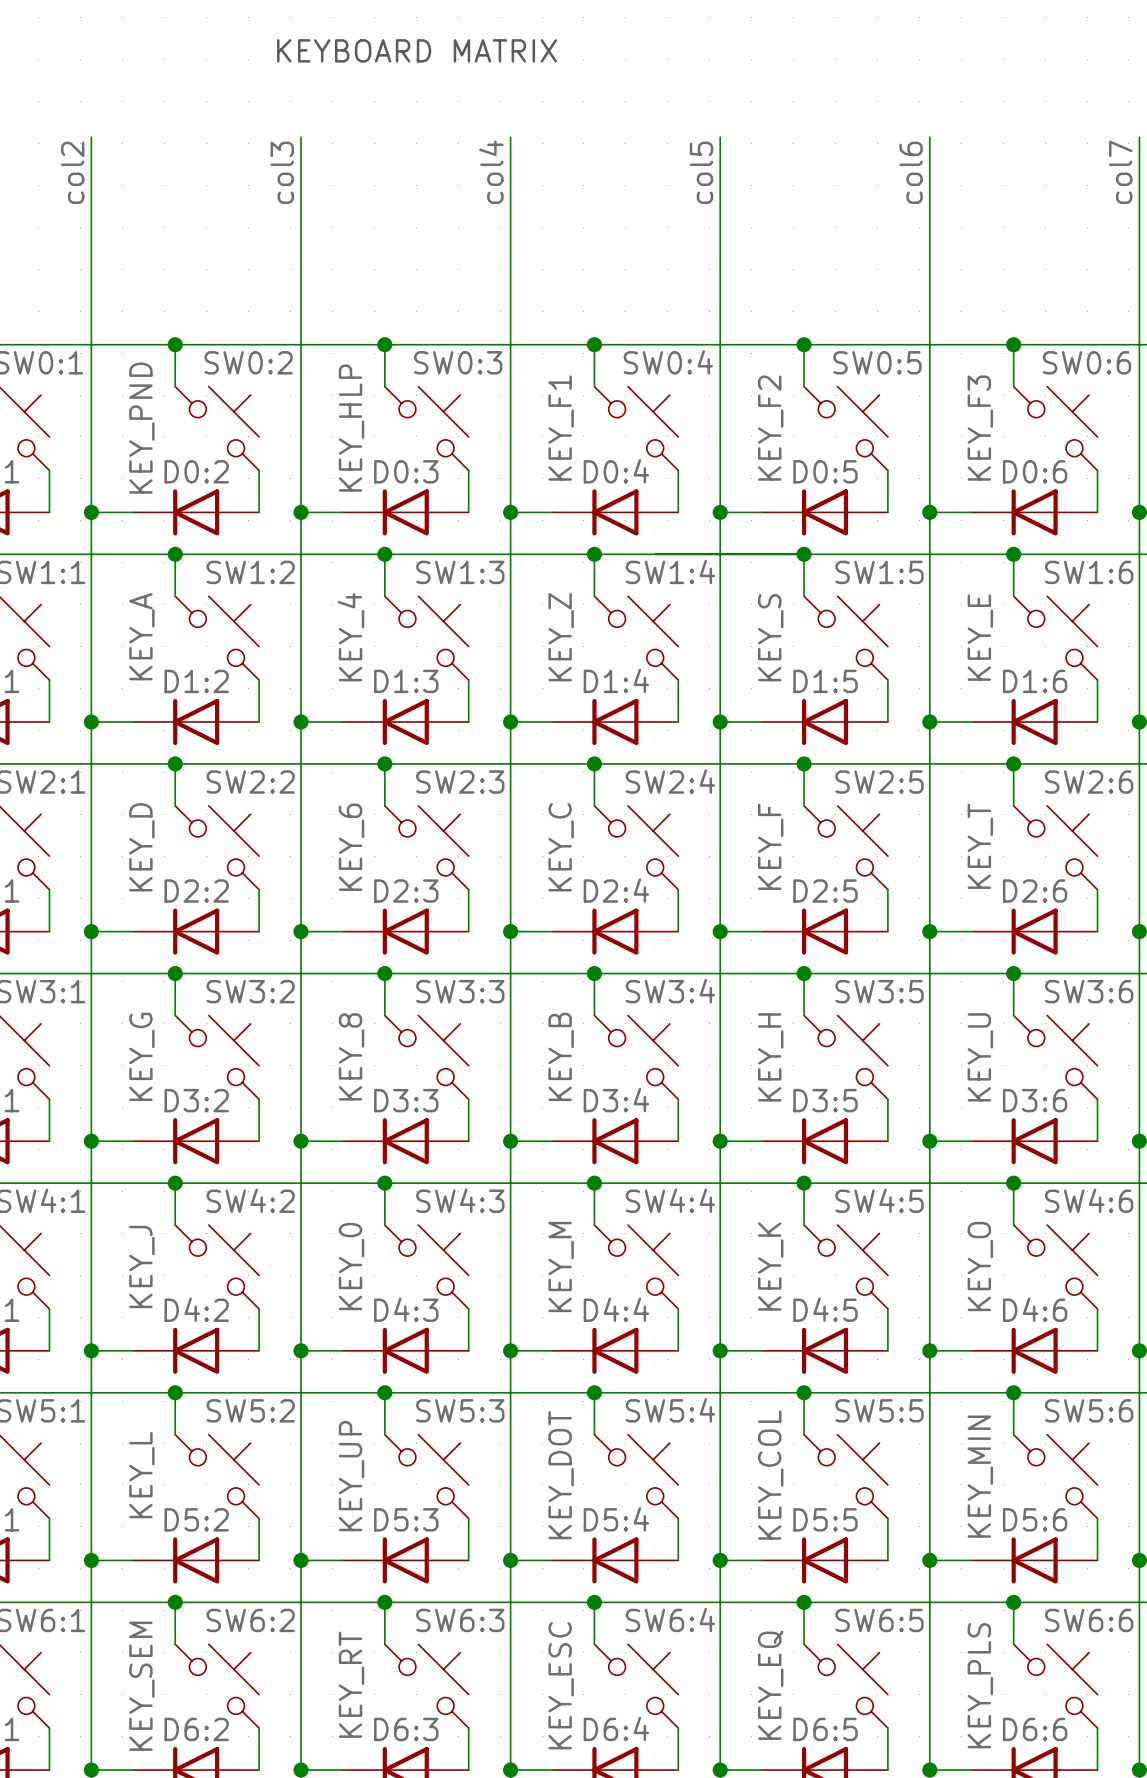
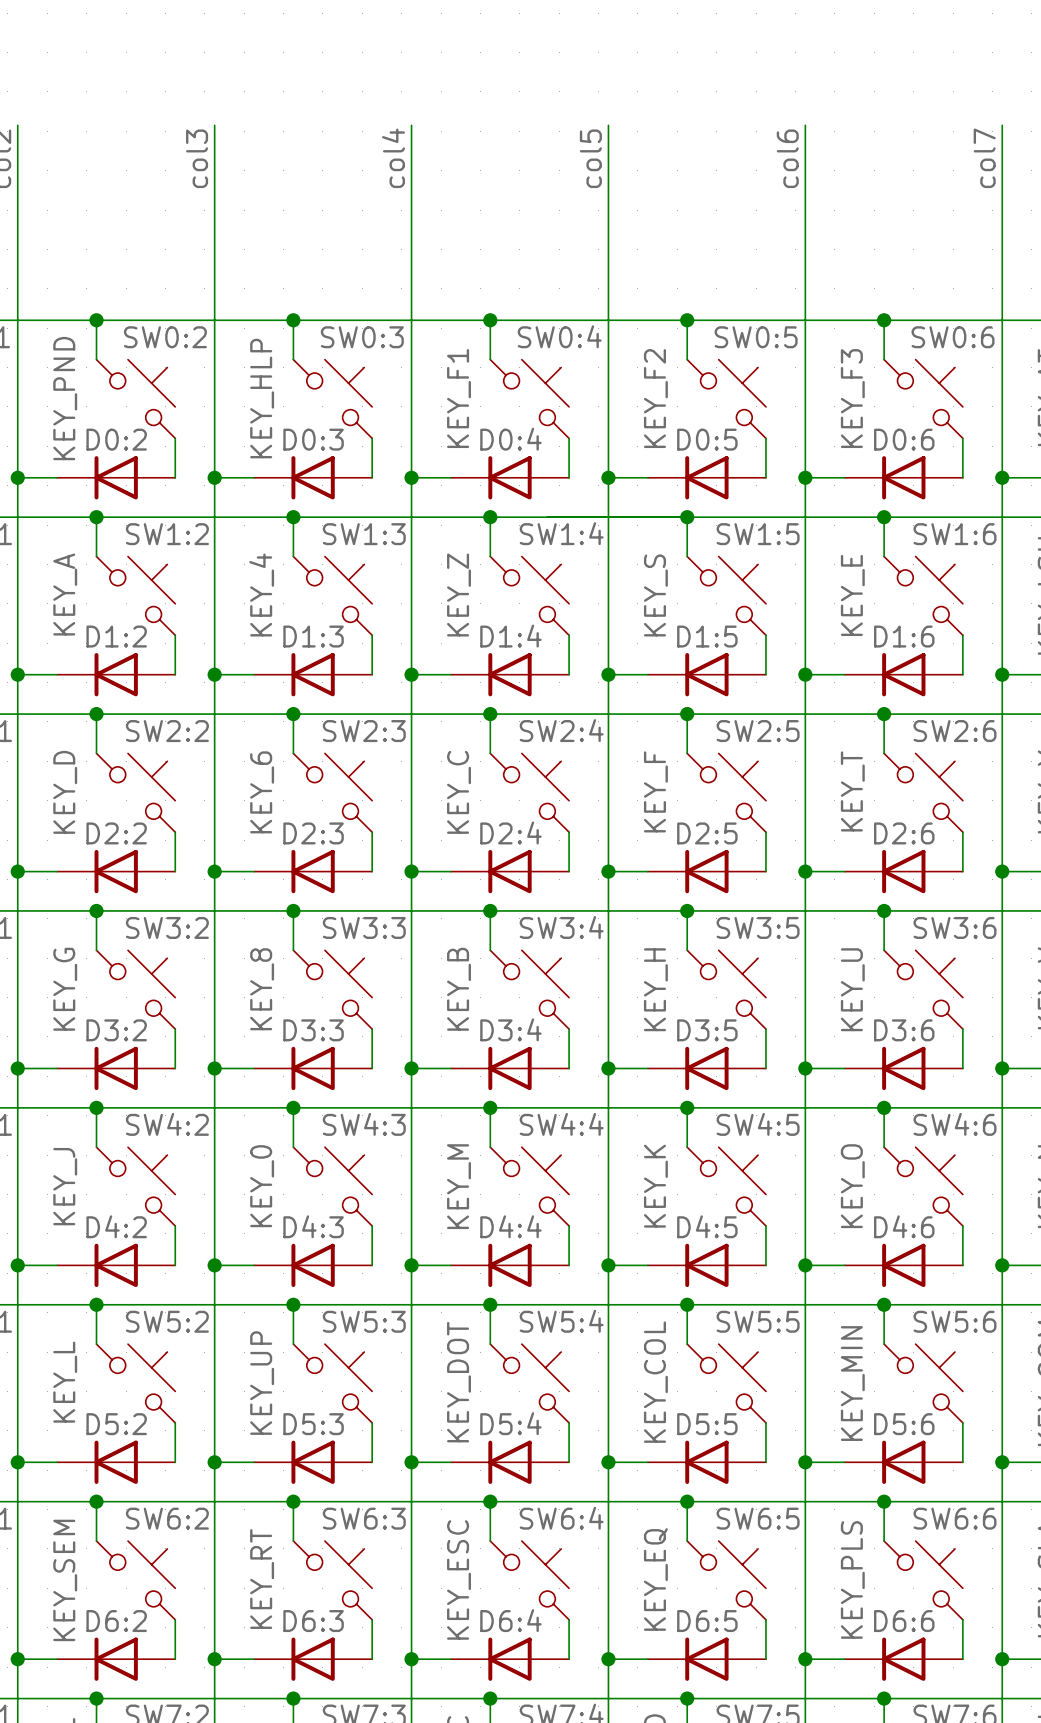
text: KEYBOARD MATRIX (417, 50) -> none

